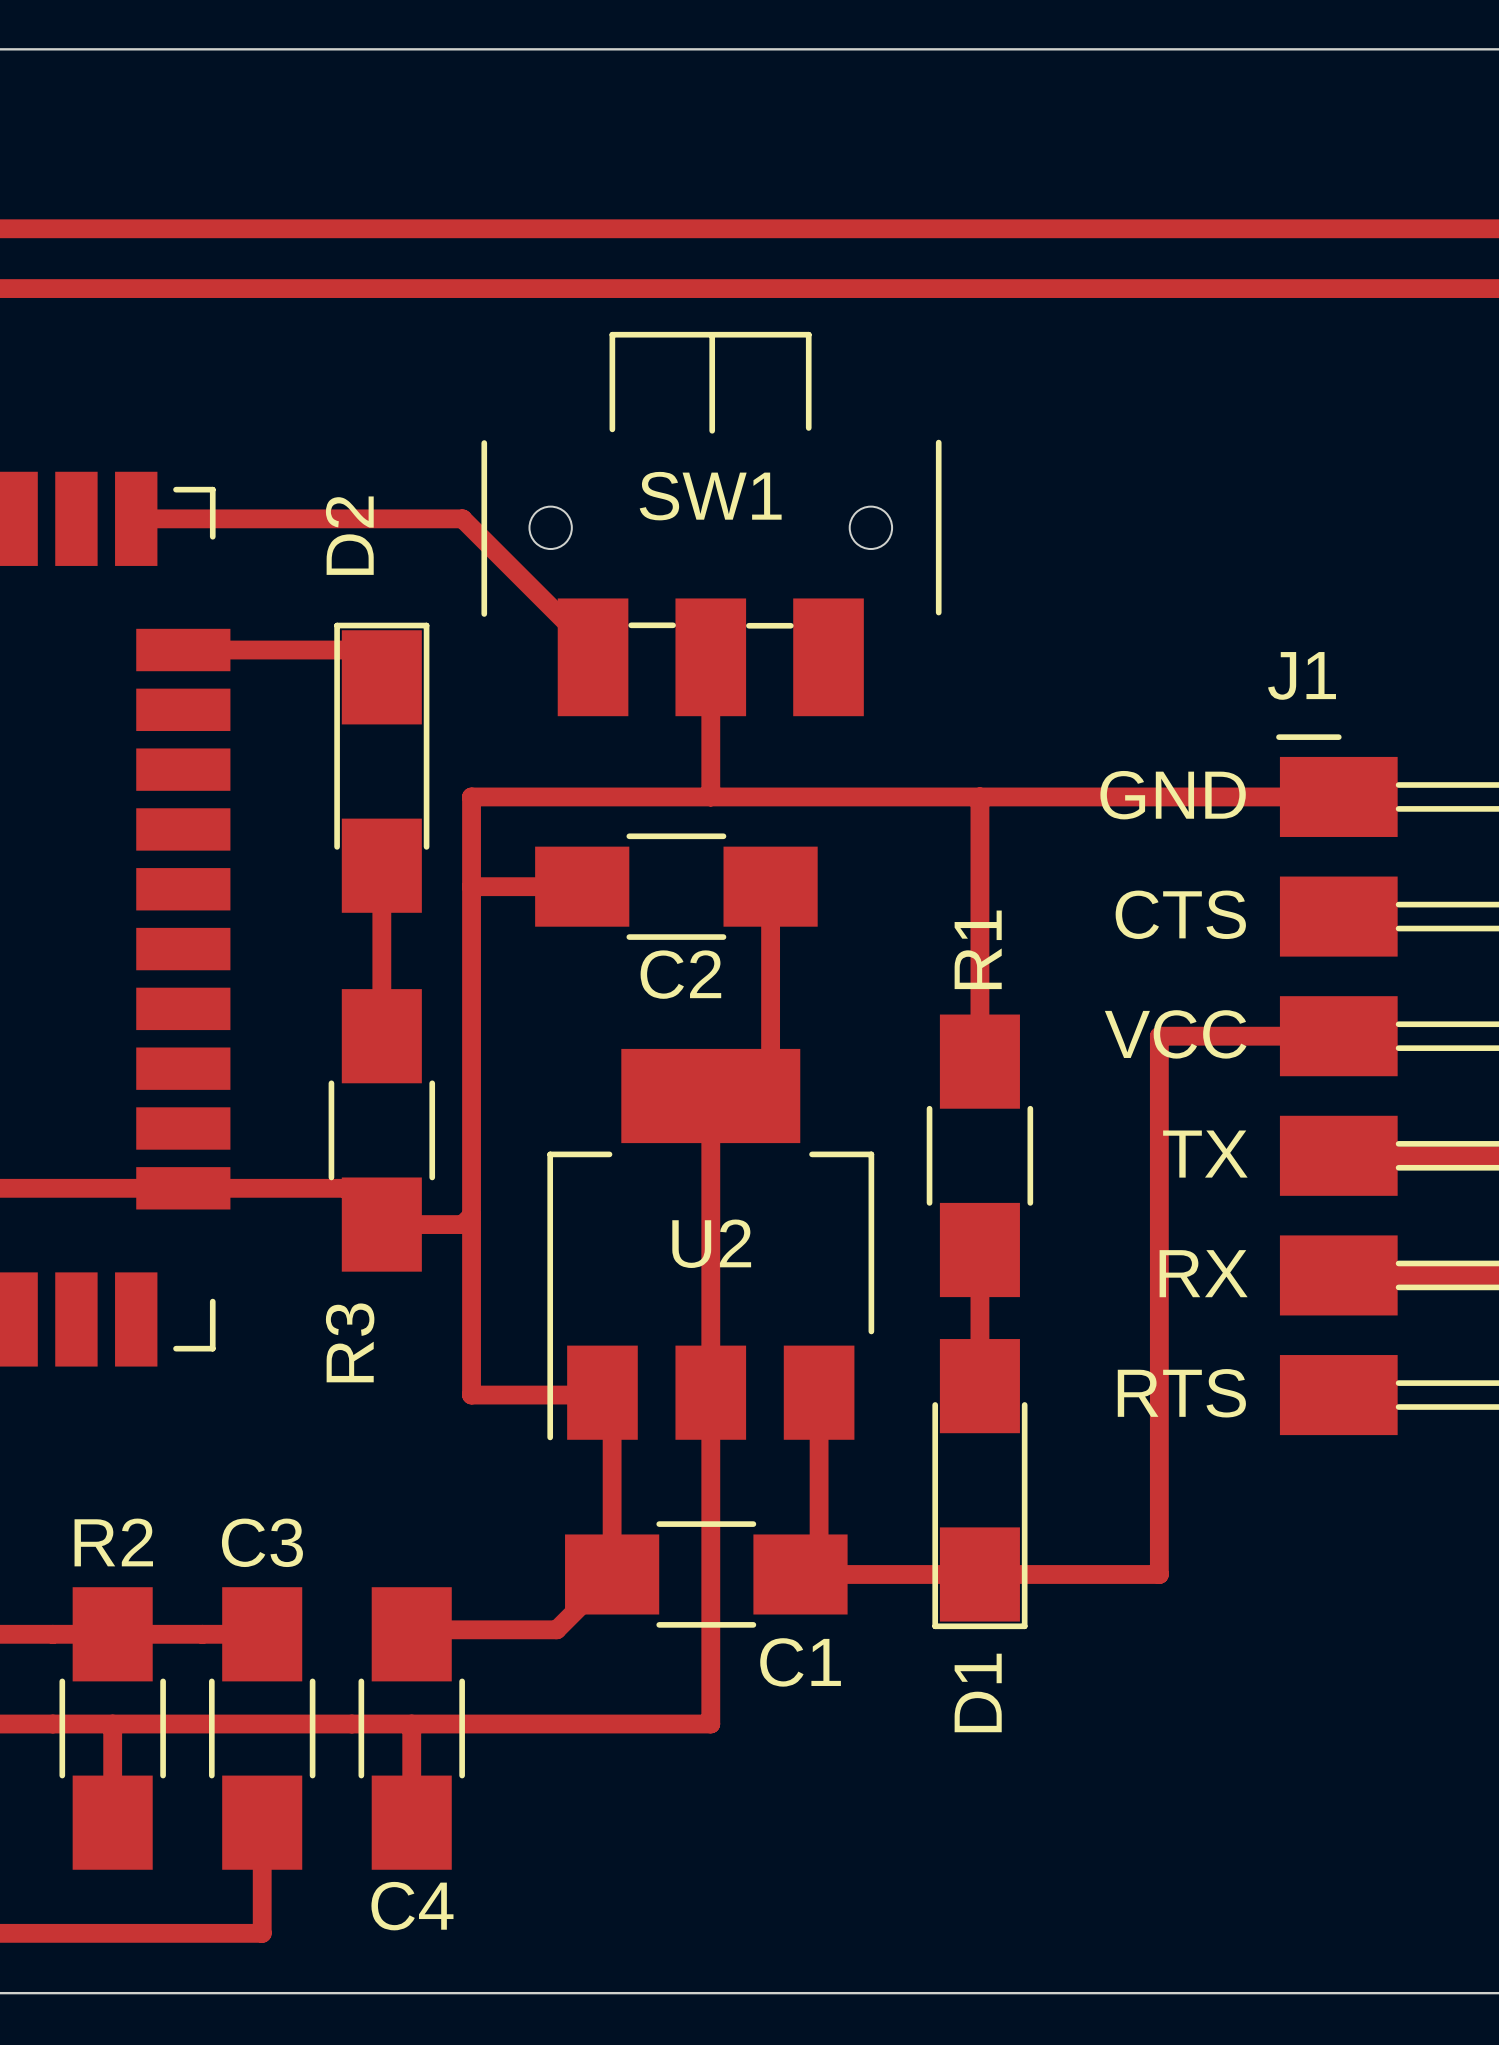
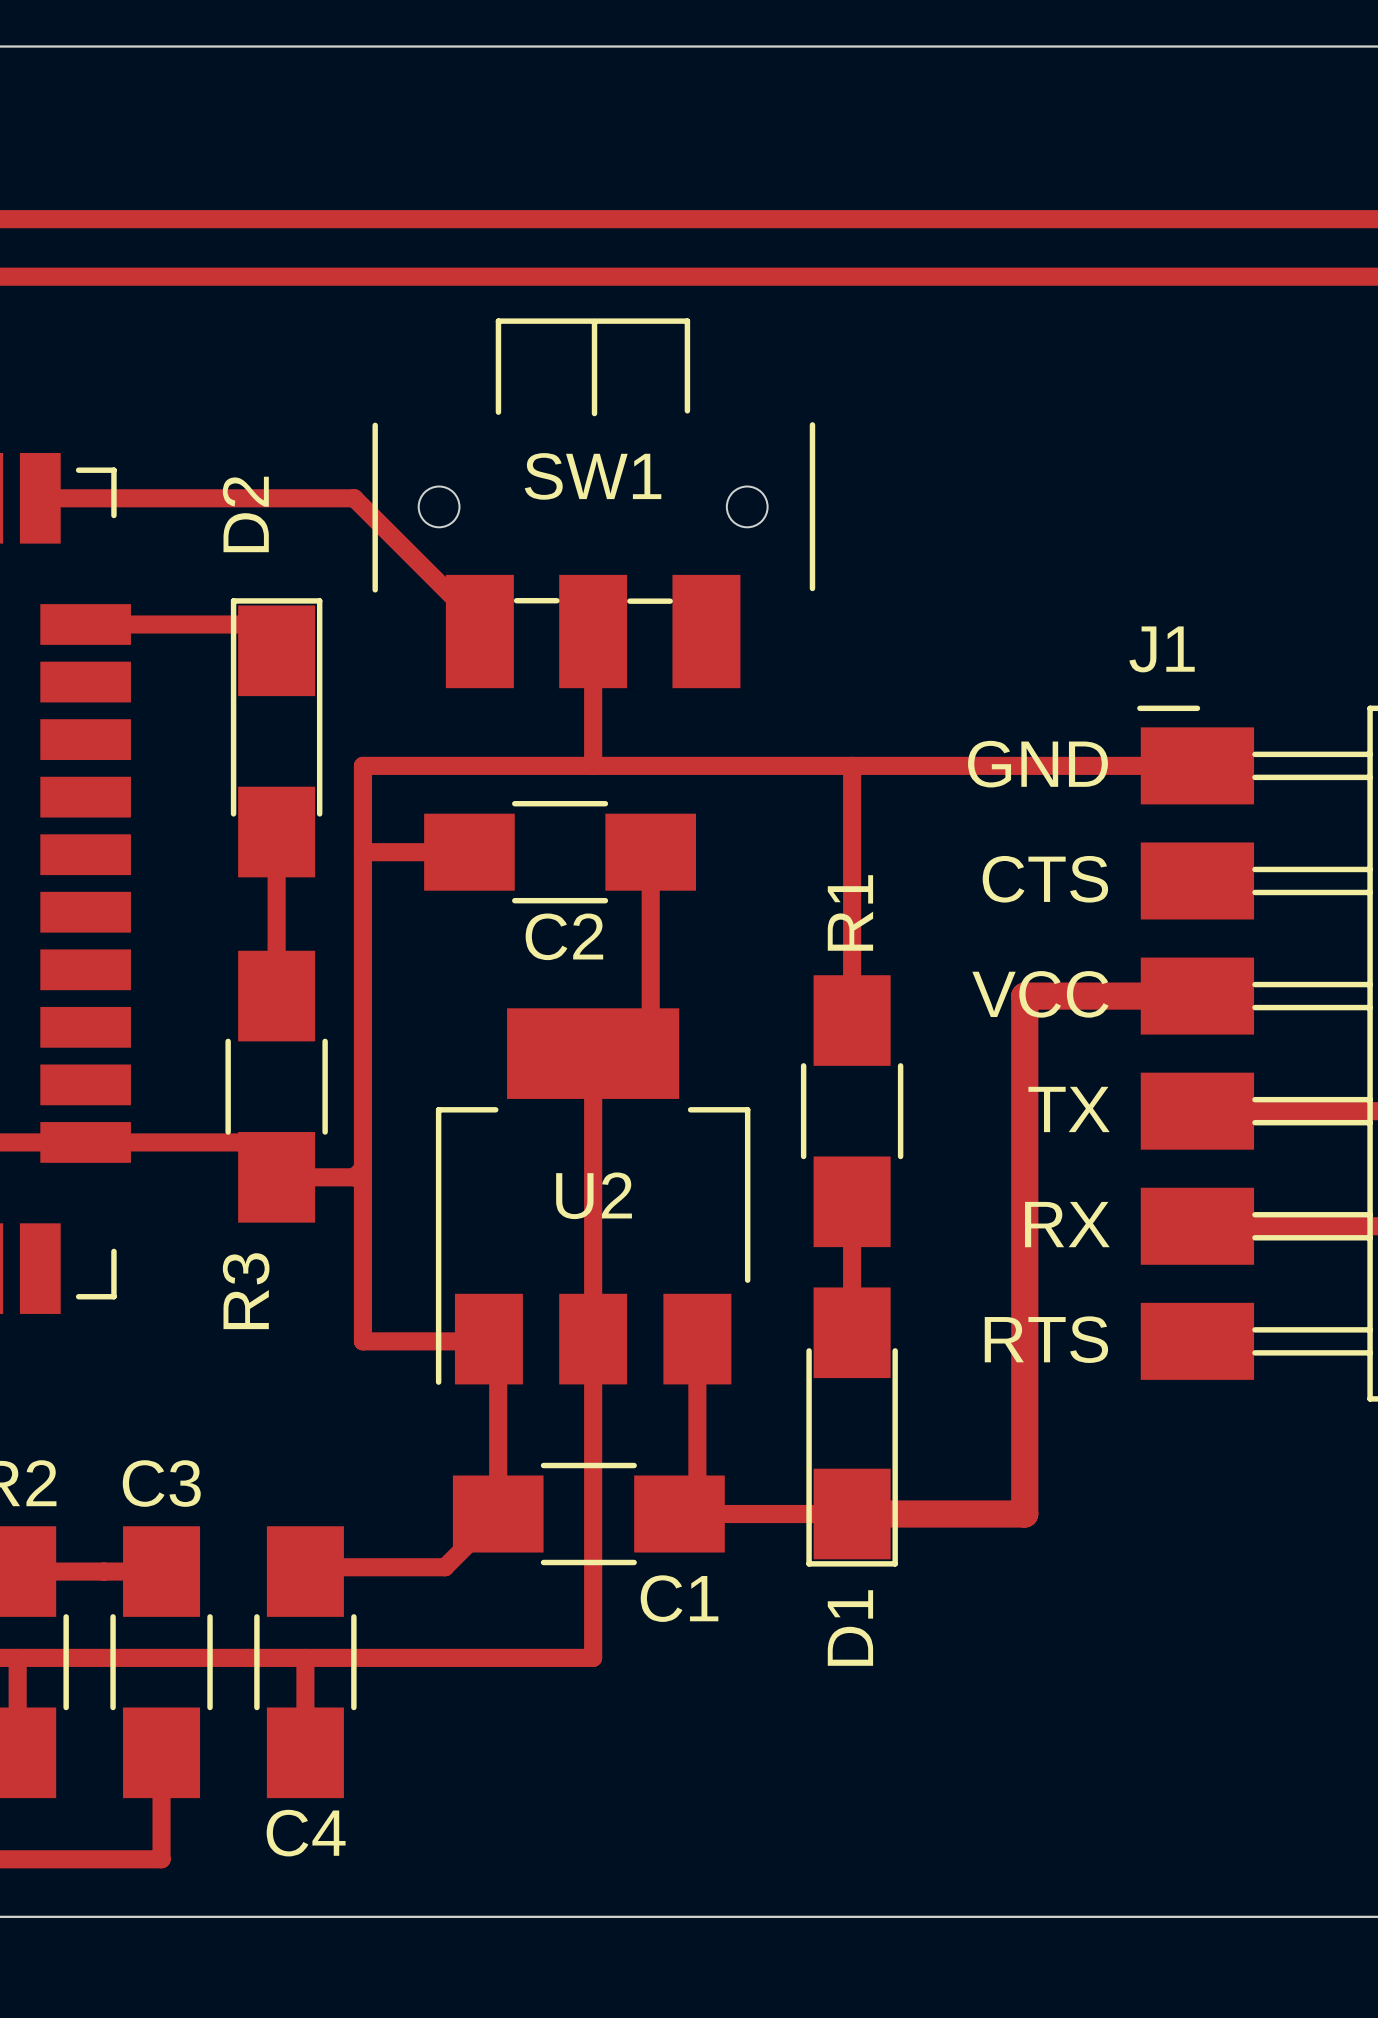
top track width: thin (1338, 1036) (1159, 1036) (1159, 1574) (979, 1574) -> thick (1197, 996) (1024, 996) (1024, 1514) (852, 1514)

